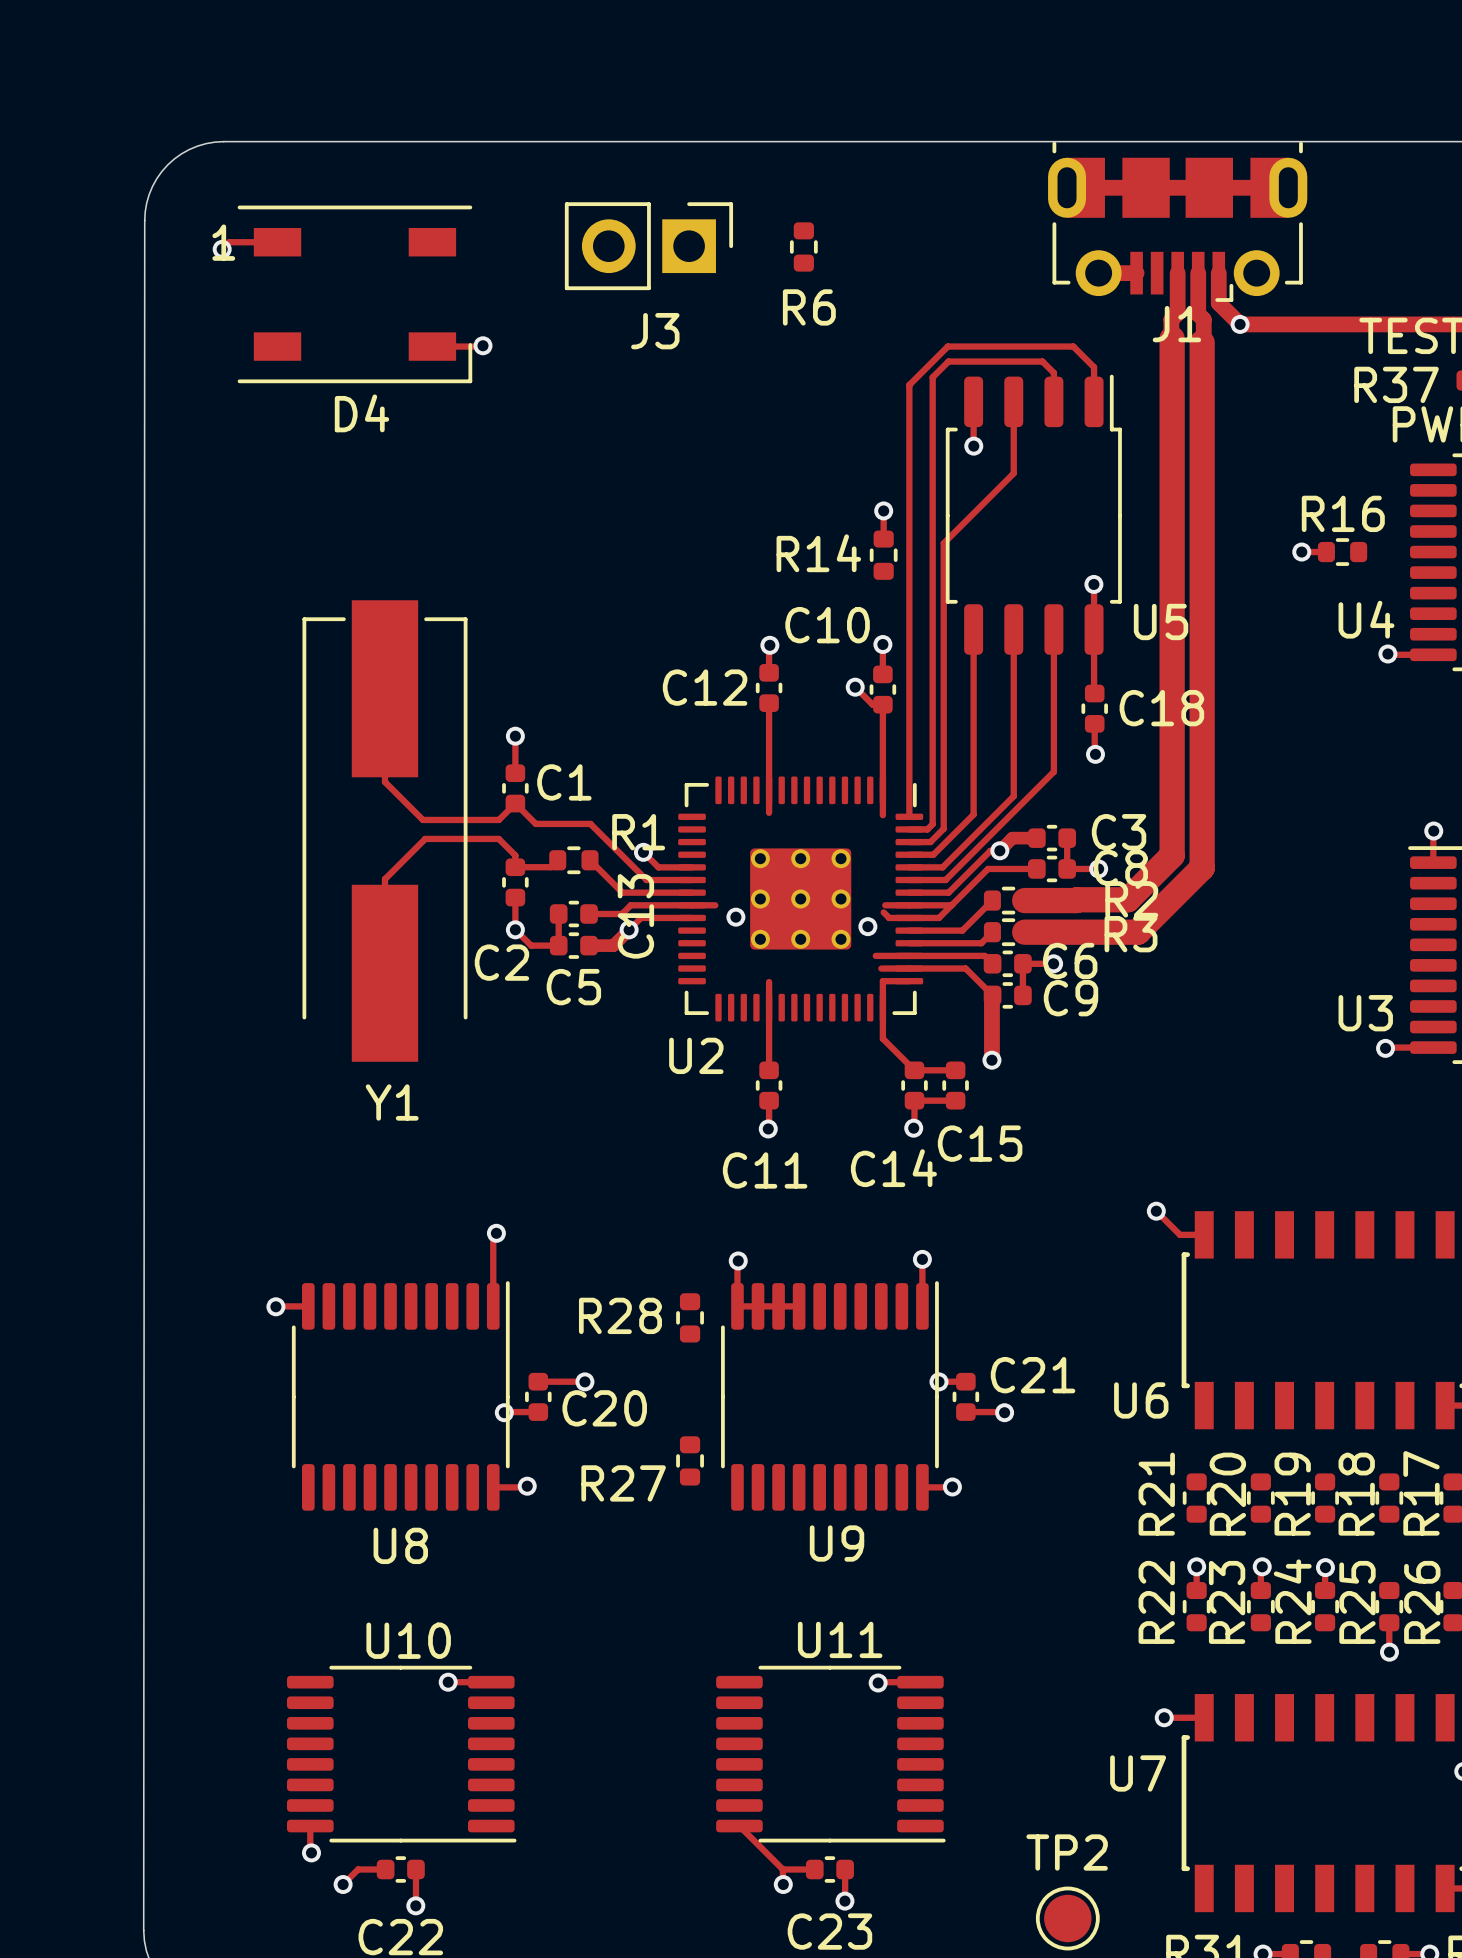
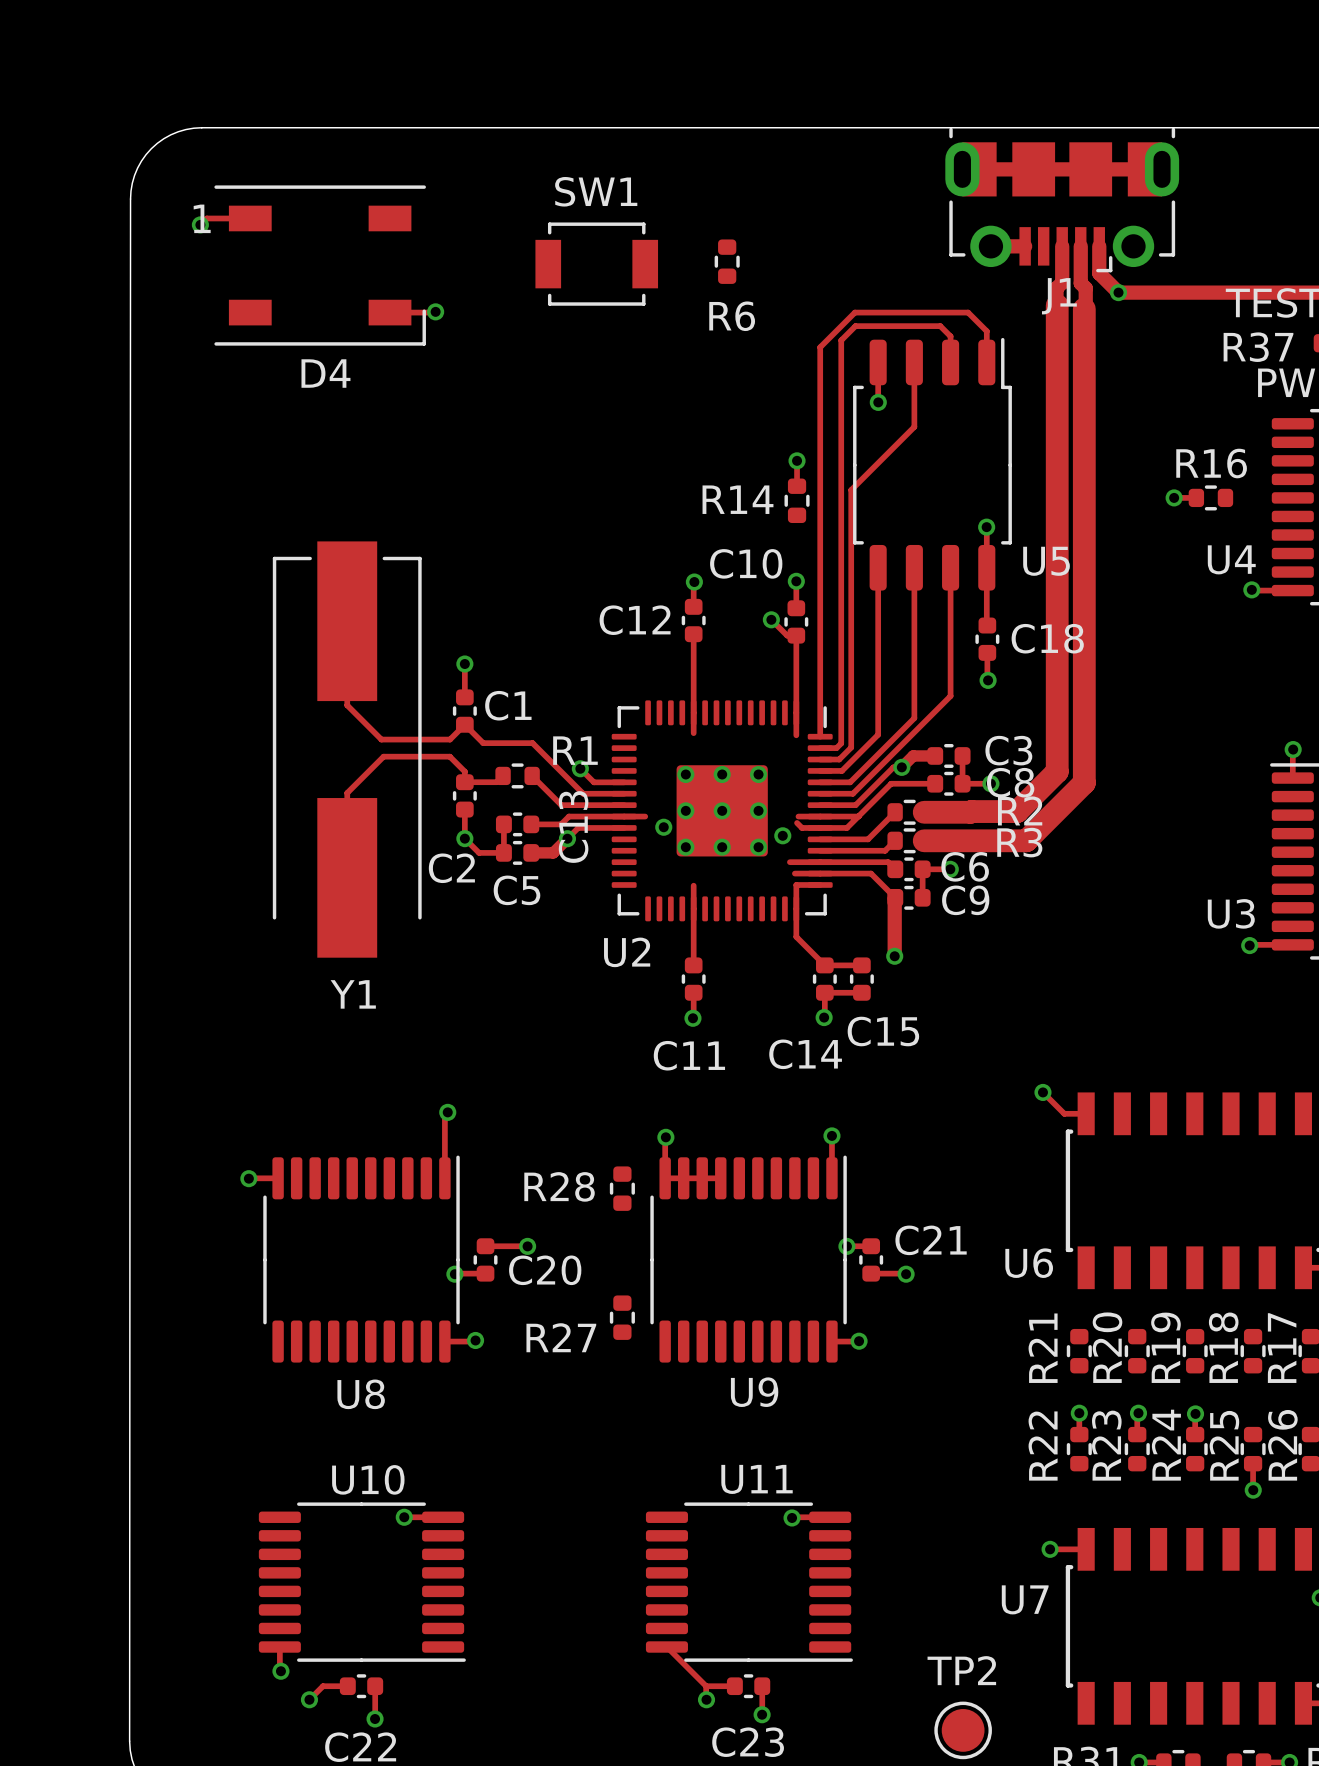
J3: (648, 246) -> none
R6 position: (803, 246) -> (727, 261)
SW1: none -> (596, 264)

